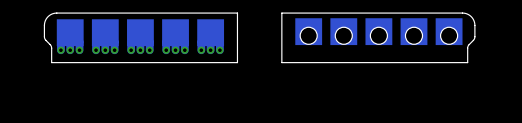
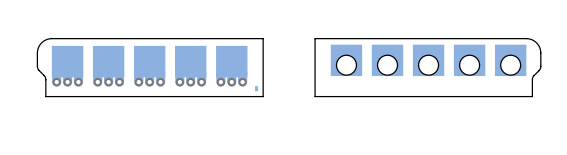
text: none -> . (256, 88)

